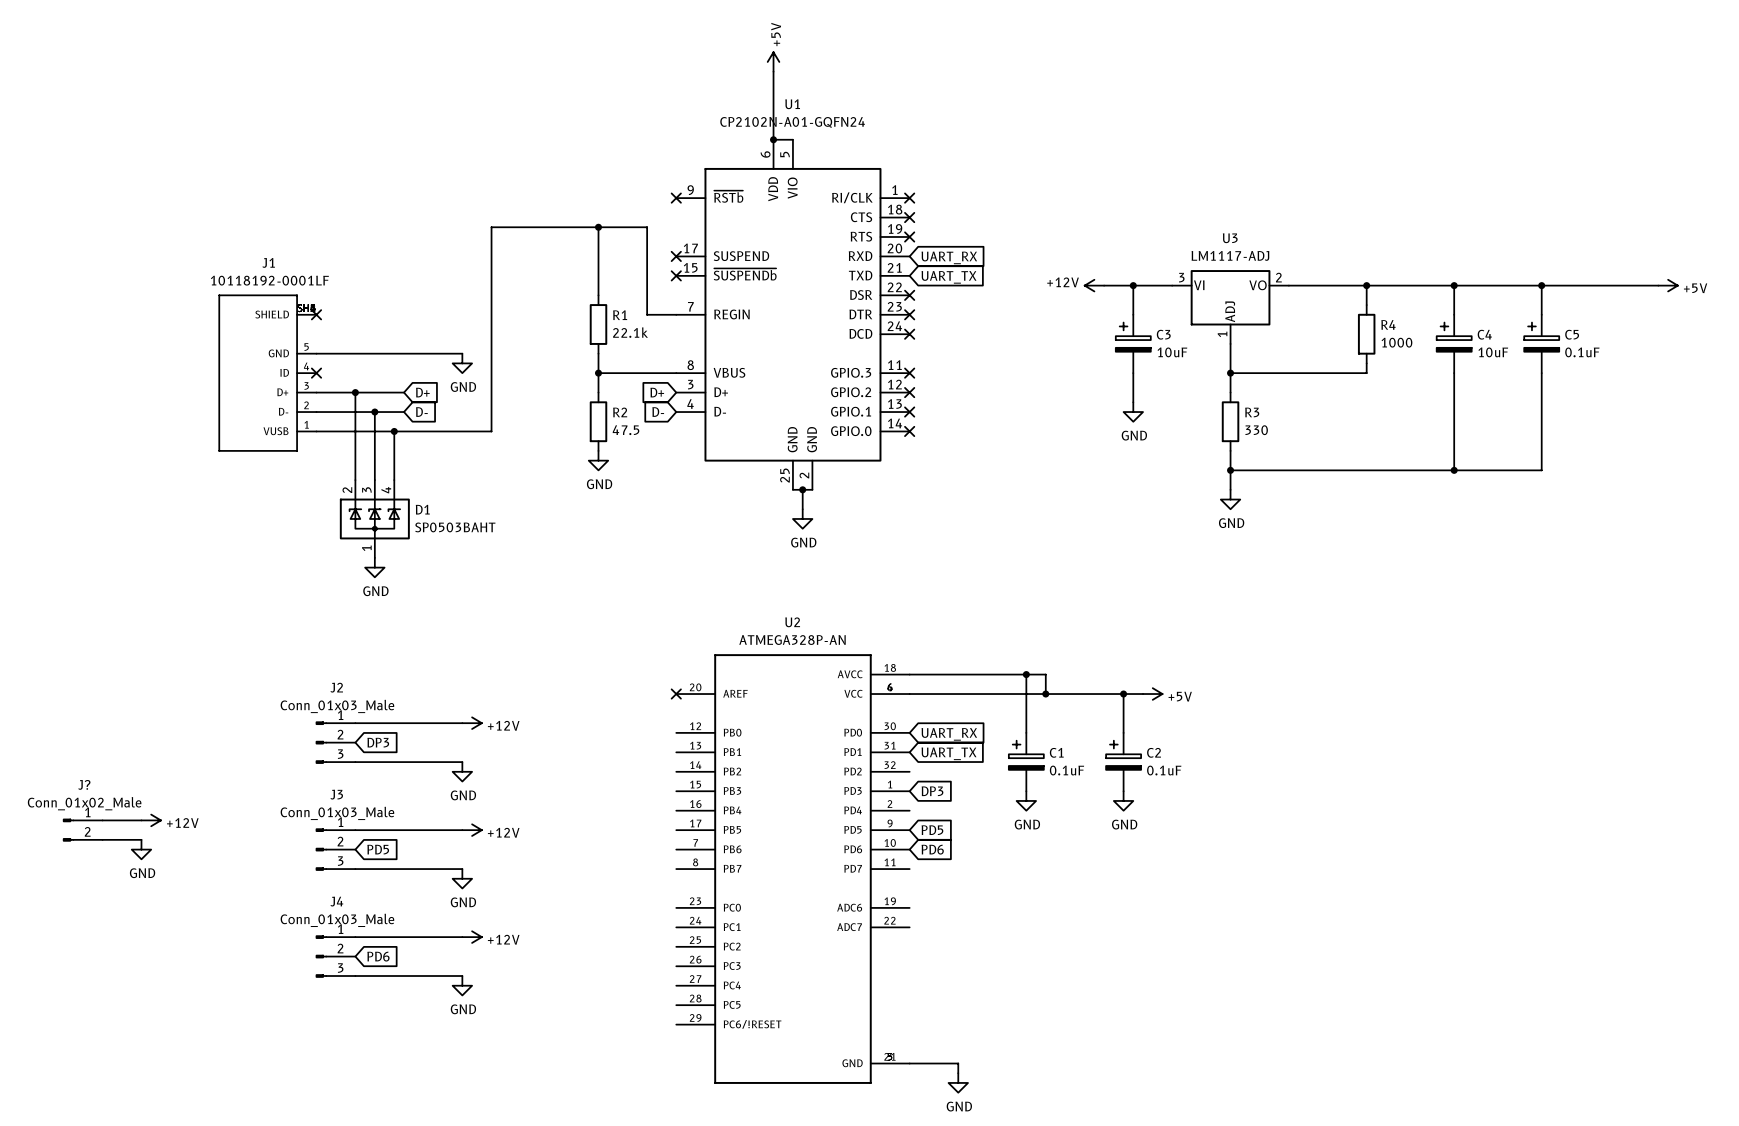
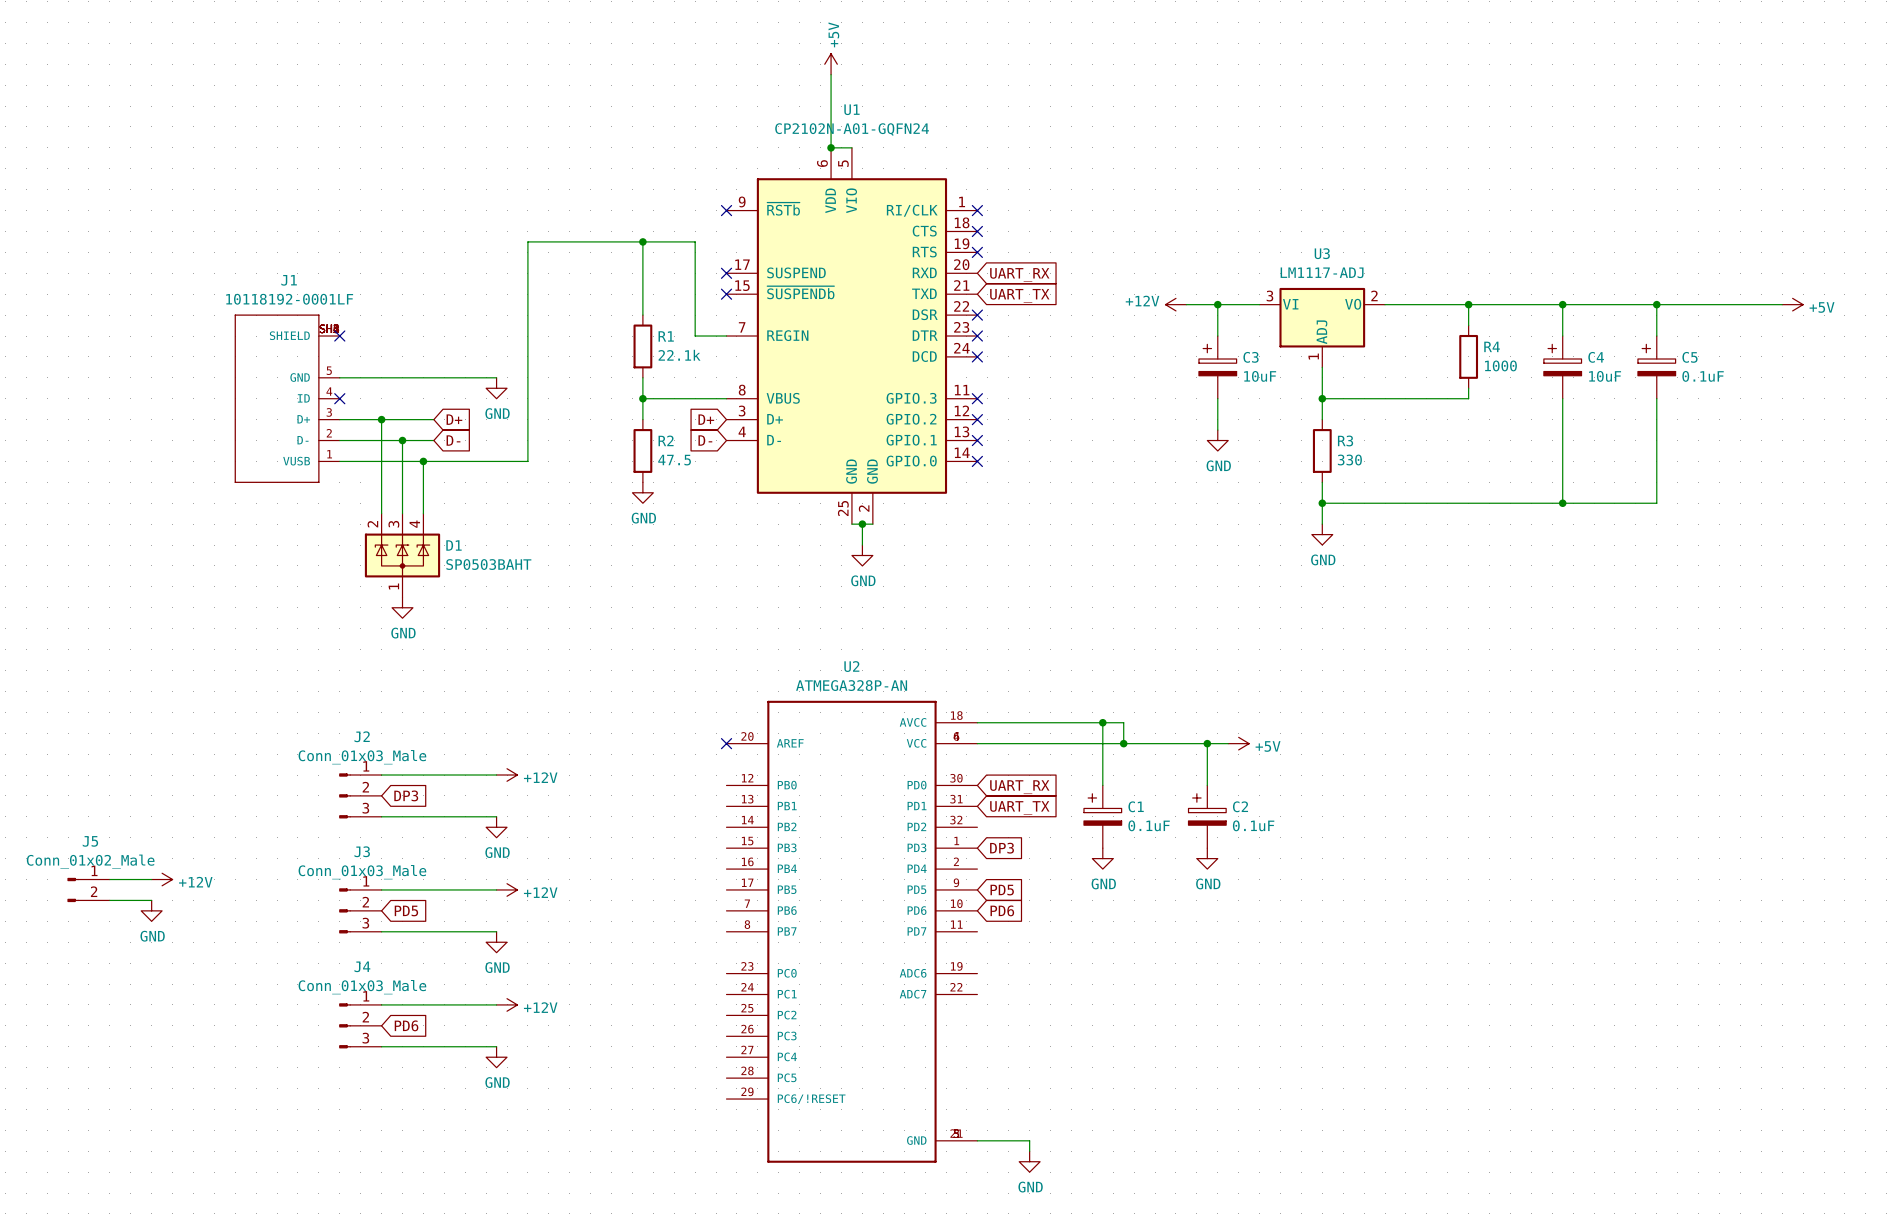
J? name: J? (84, 784) -> J5 (90, 841)

